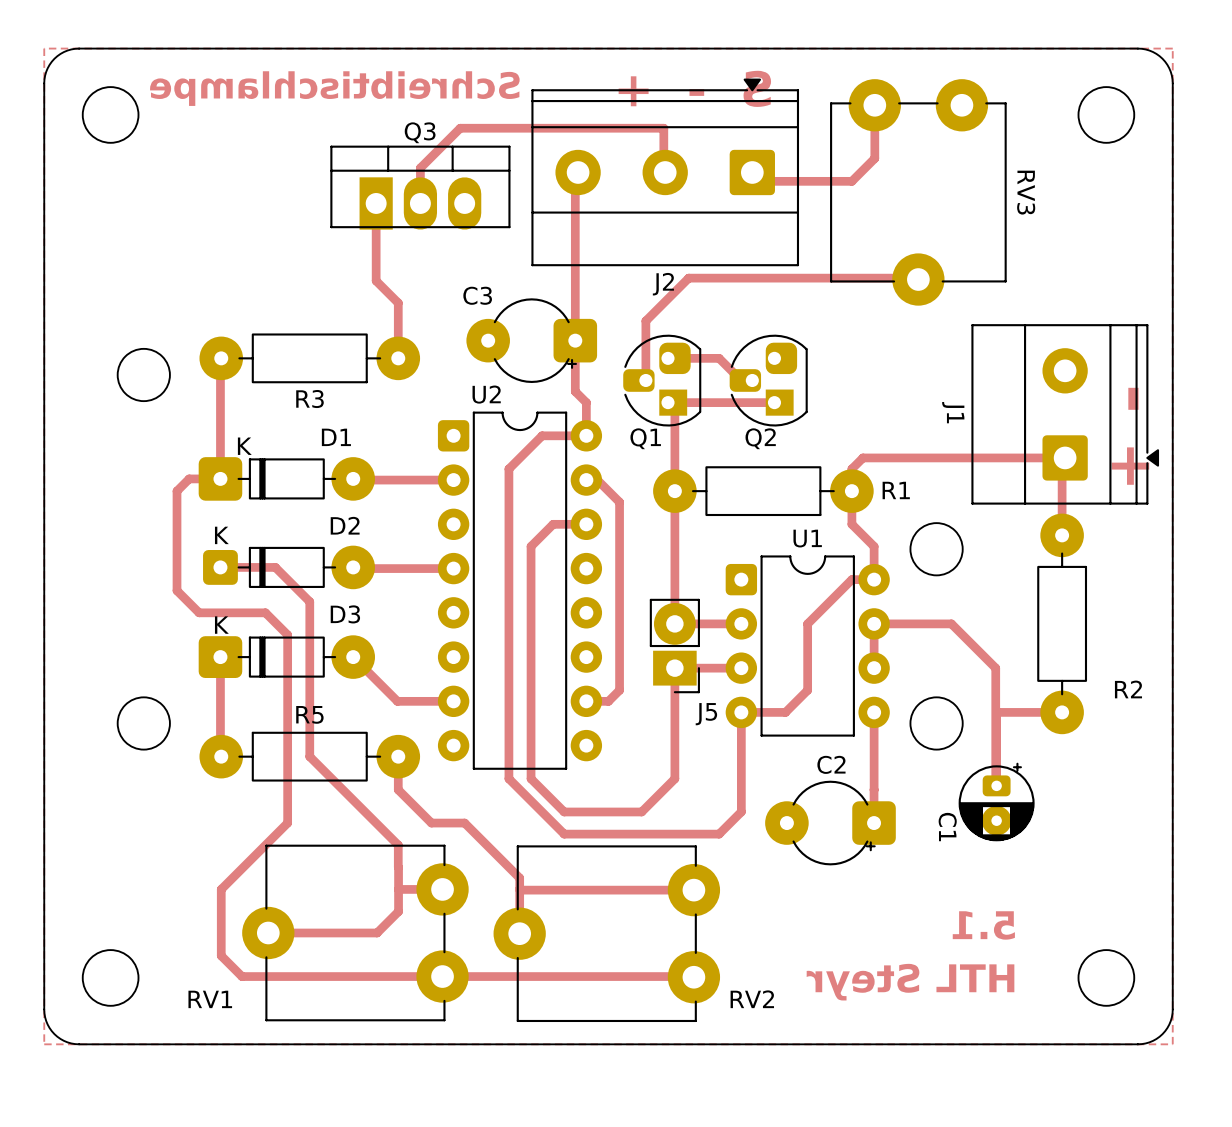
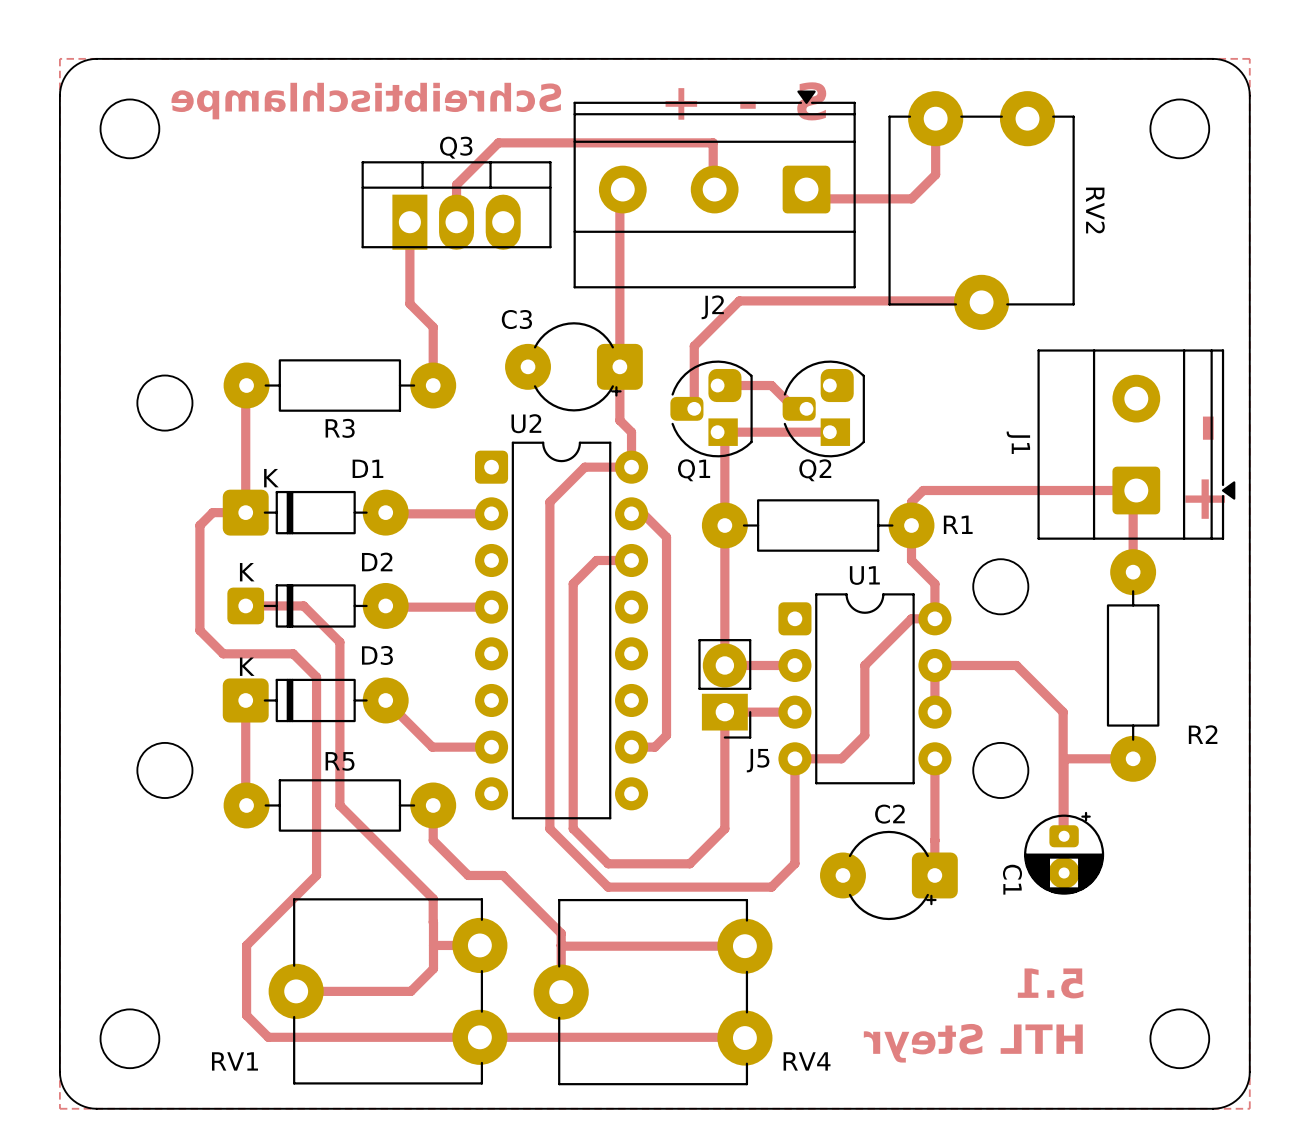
RV3 name: RV3 (1026, 192) -> RV2 (1095, 210)
RV2 name: RV2 (752, 999) -> RV4 (807, 1061)

